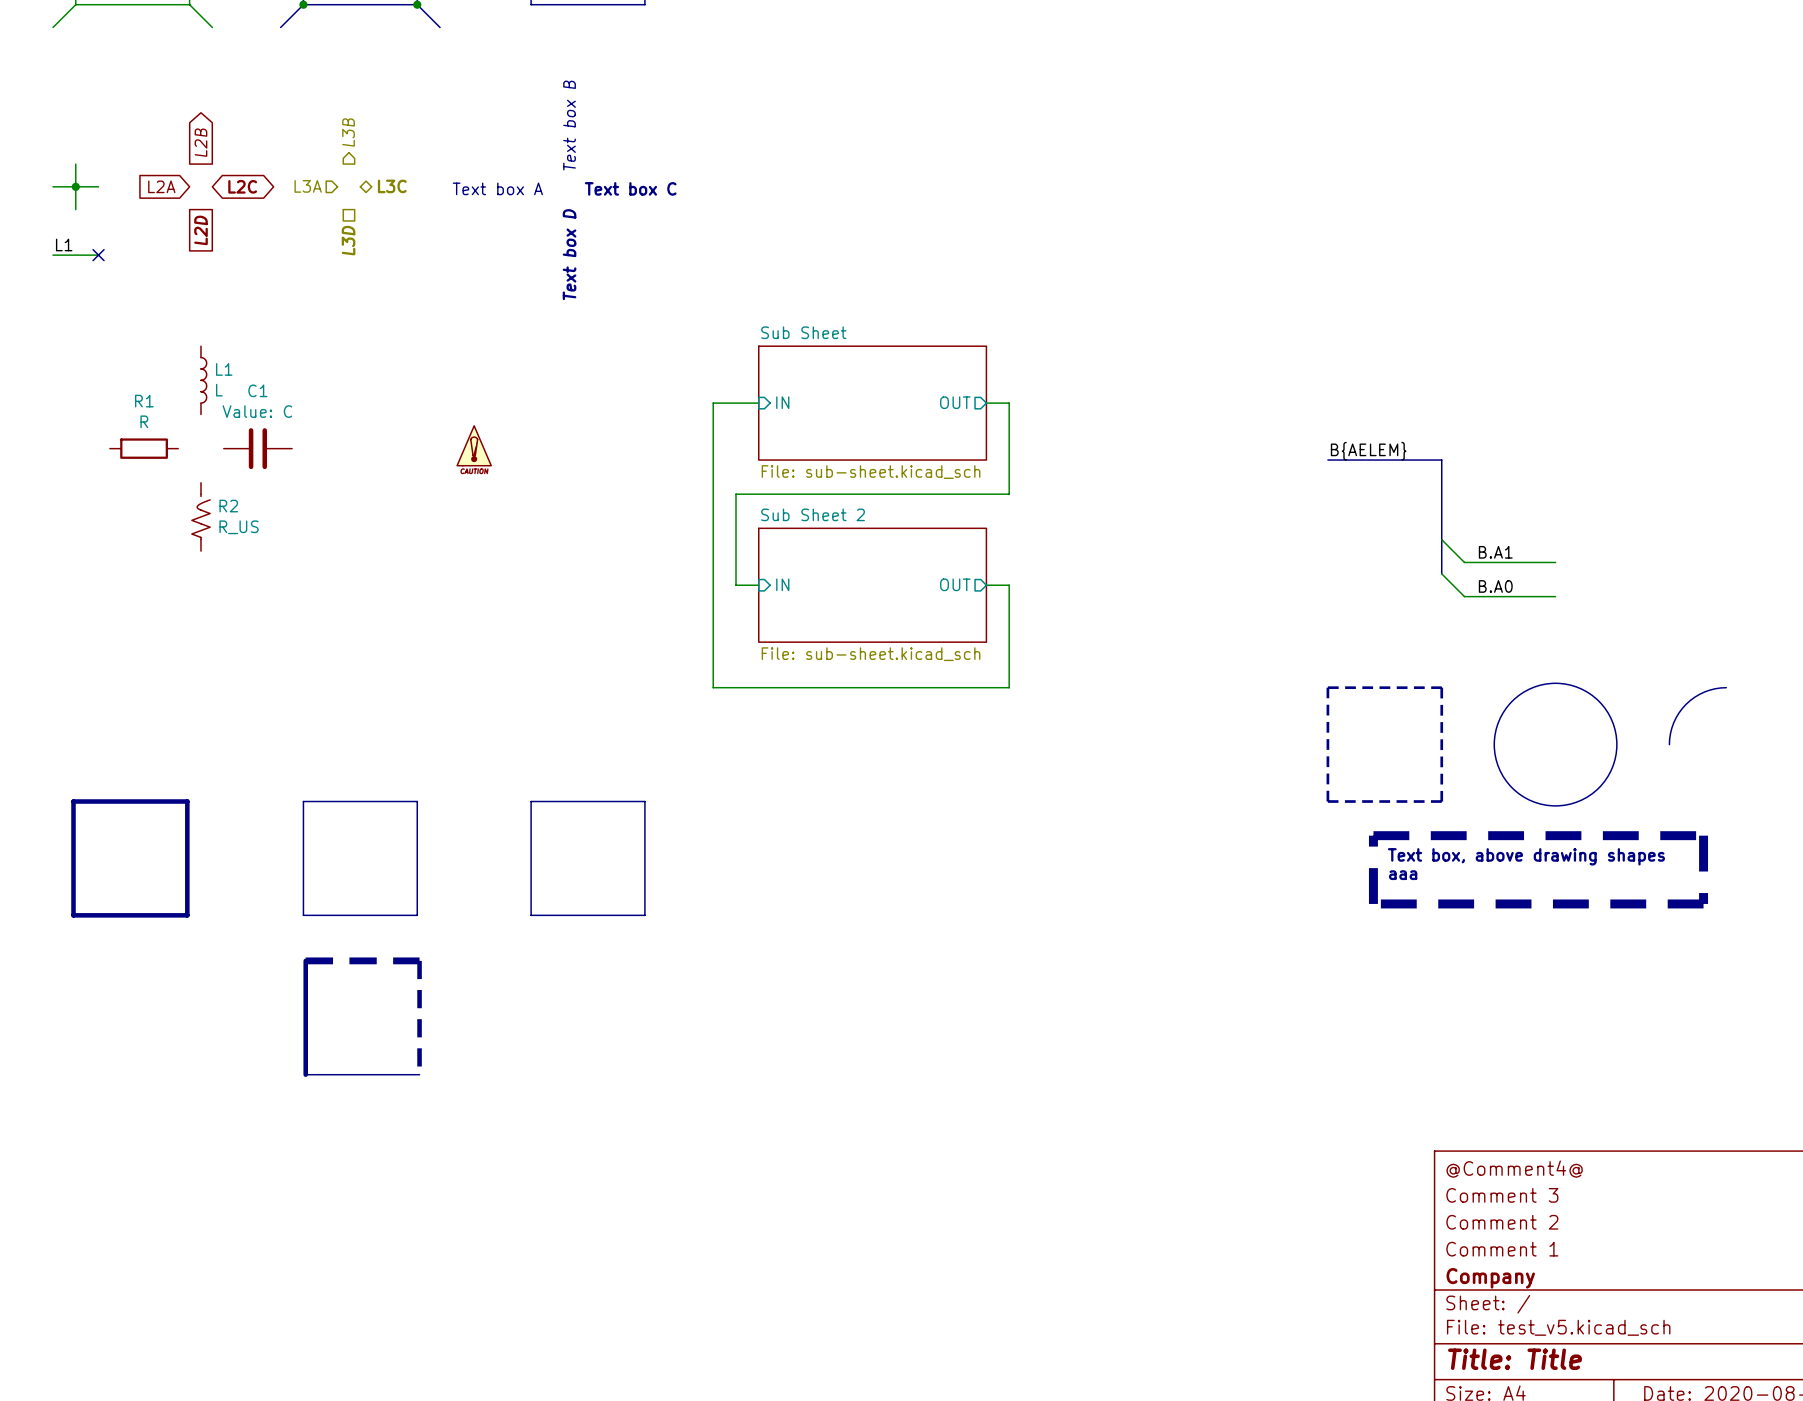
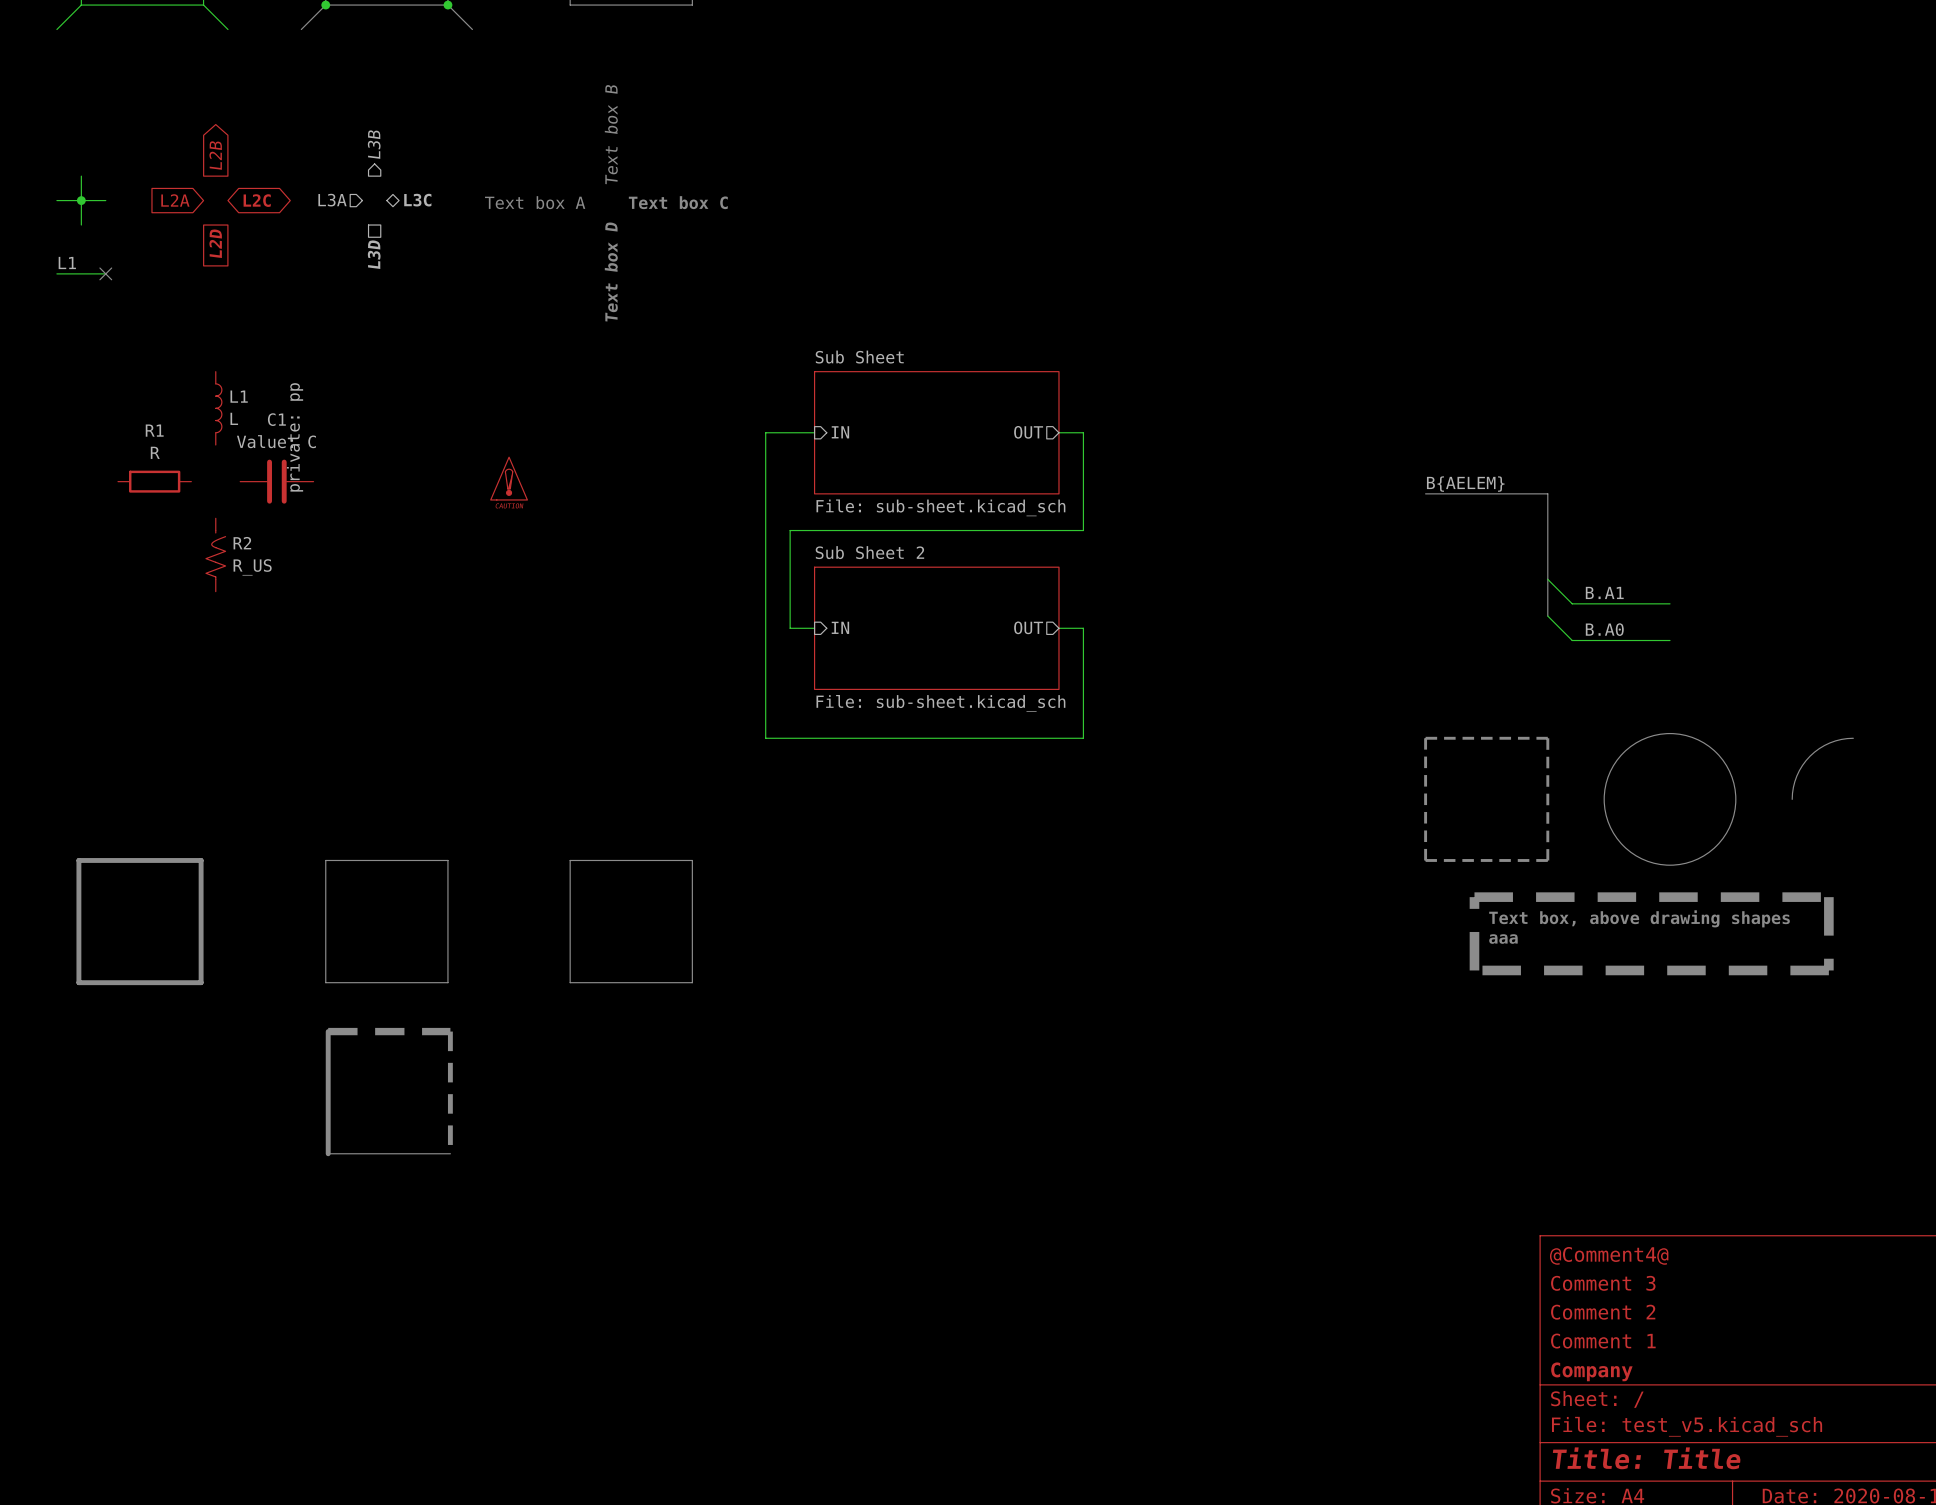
C1 text: none -> private: pp (295, 437)

